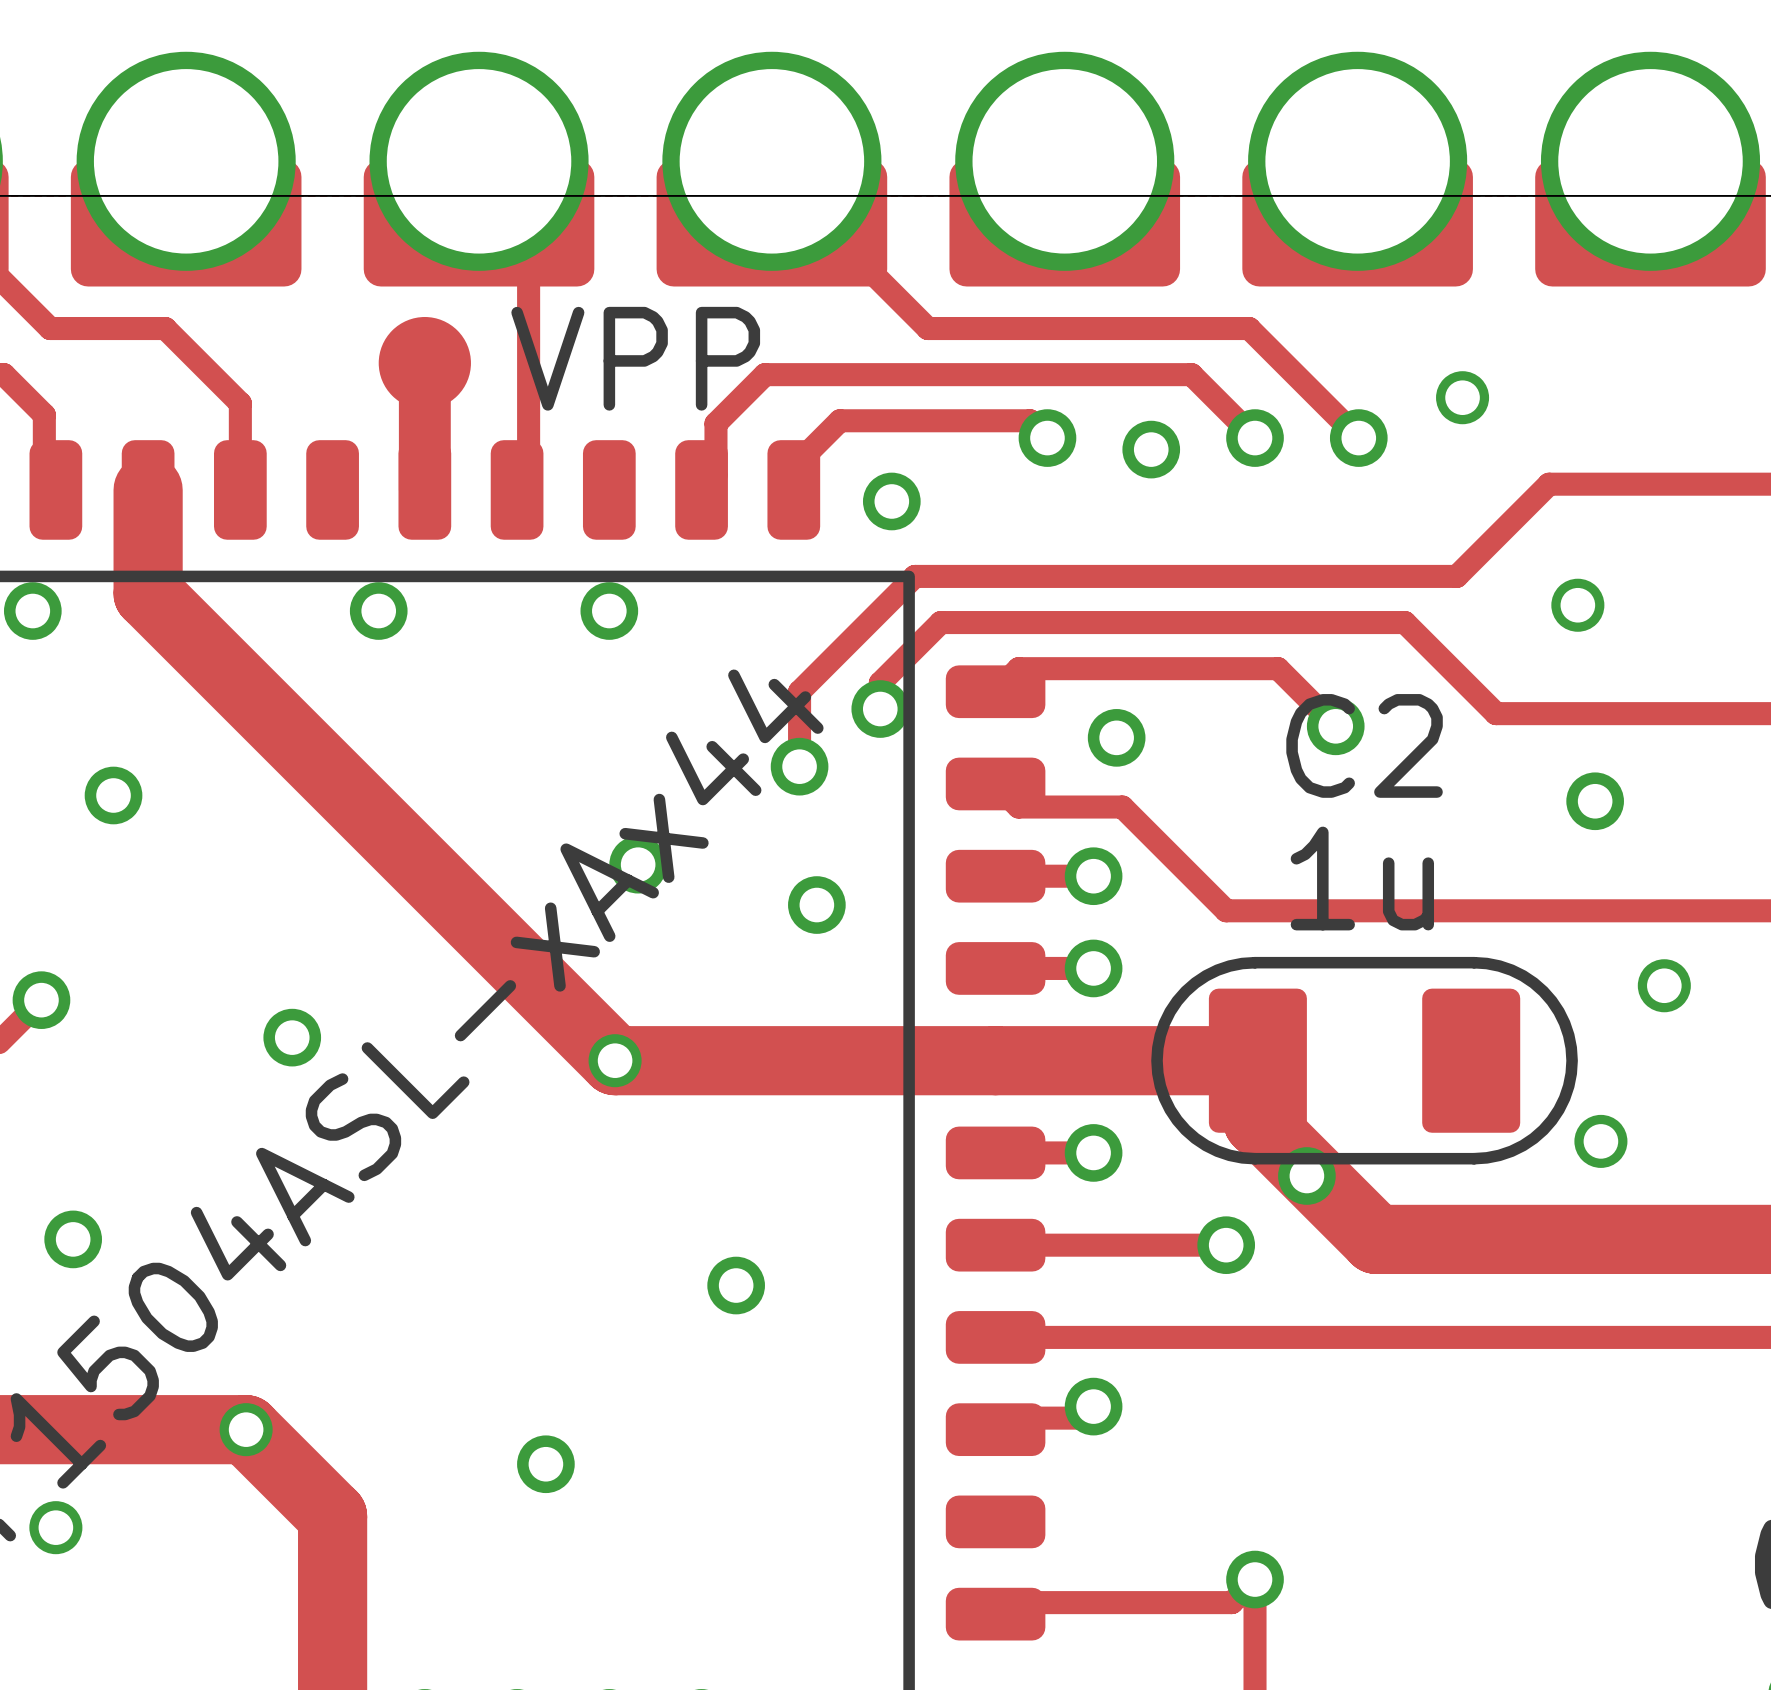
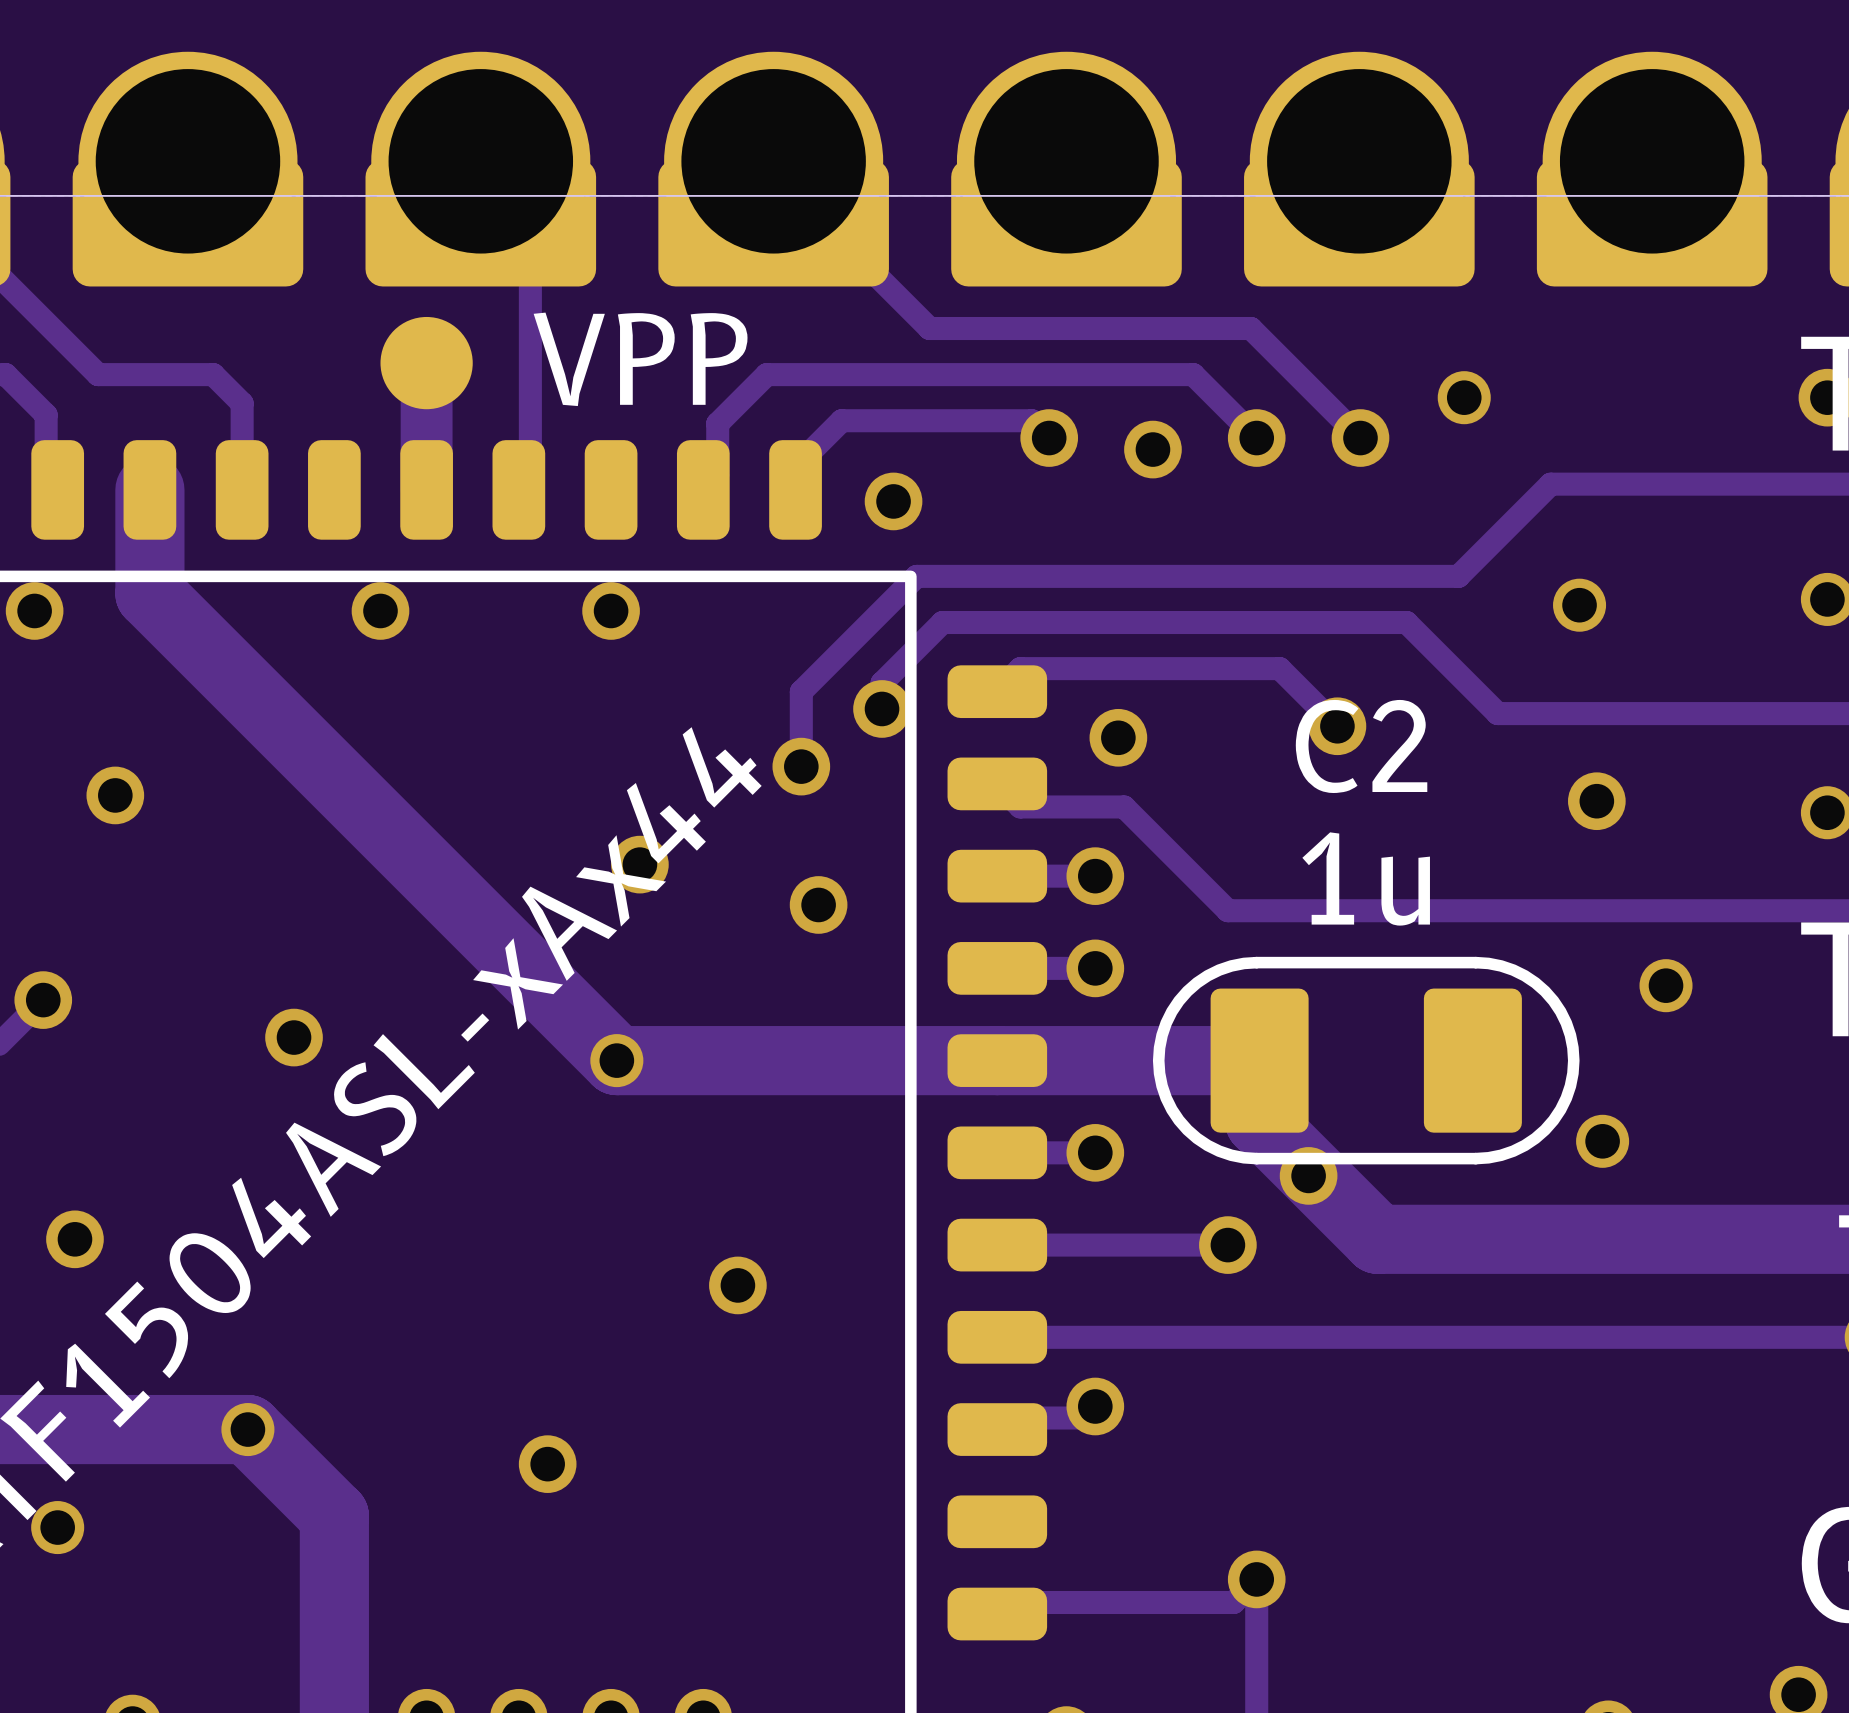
track: (50, 328) (165, 328) (211, 374) -> (51, 328) (98, 374) (213, 374)

